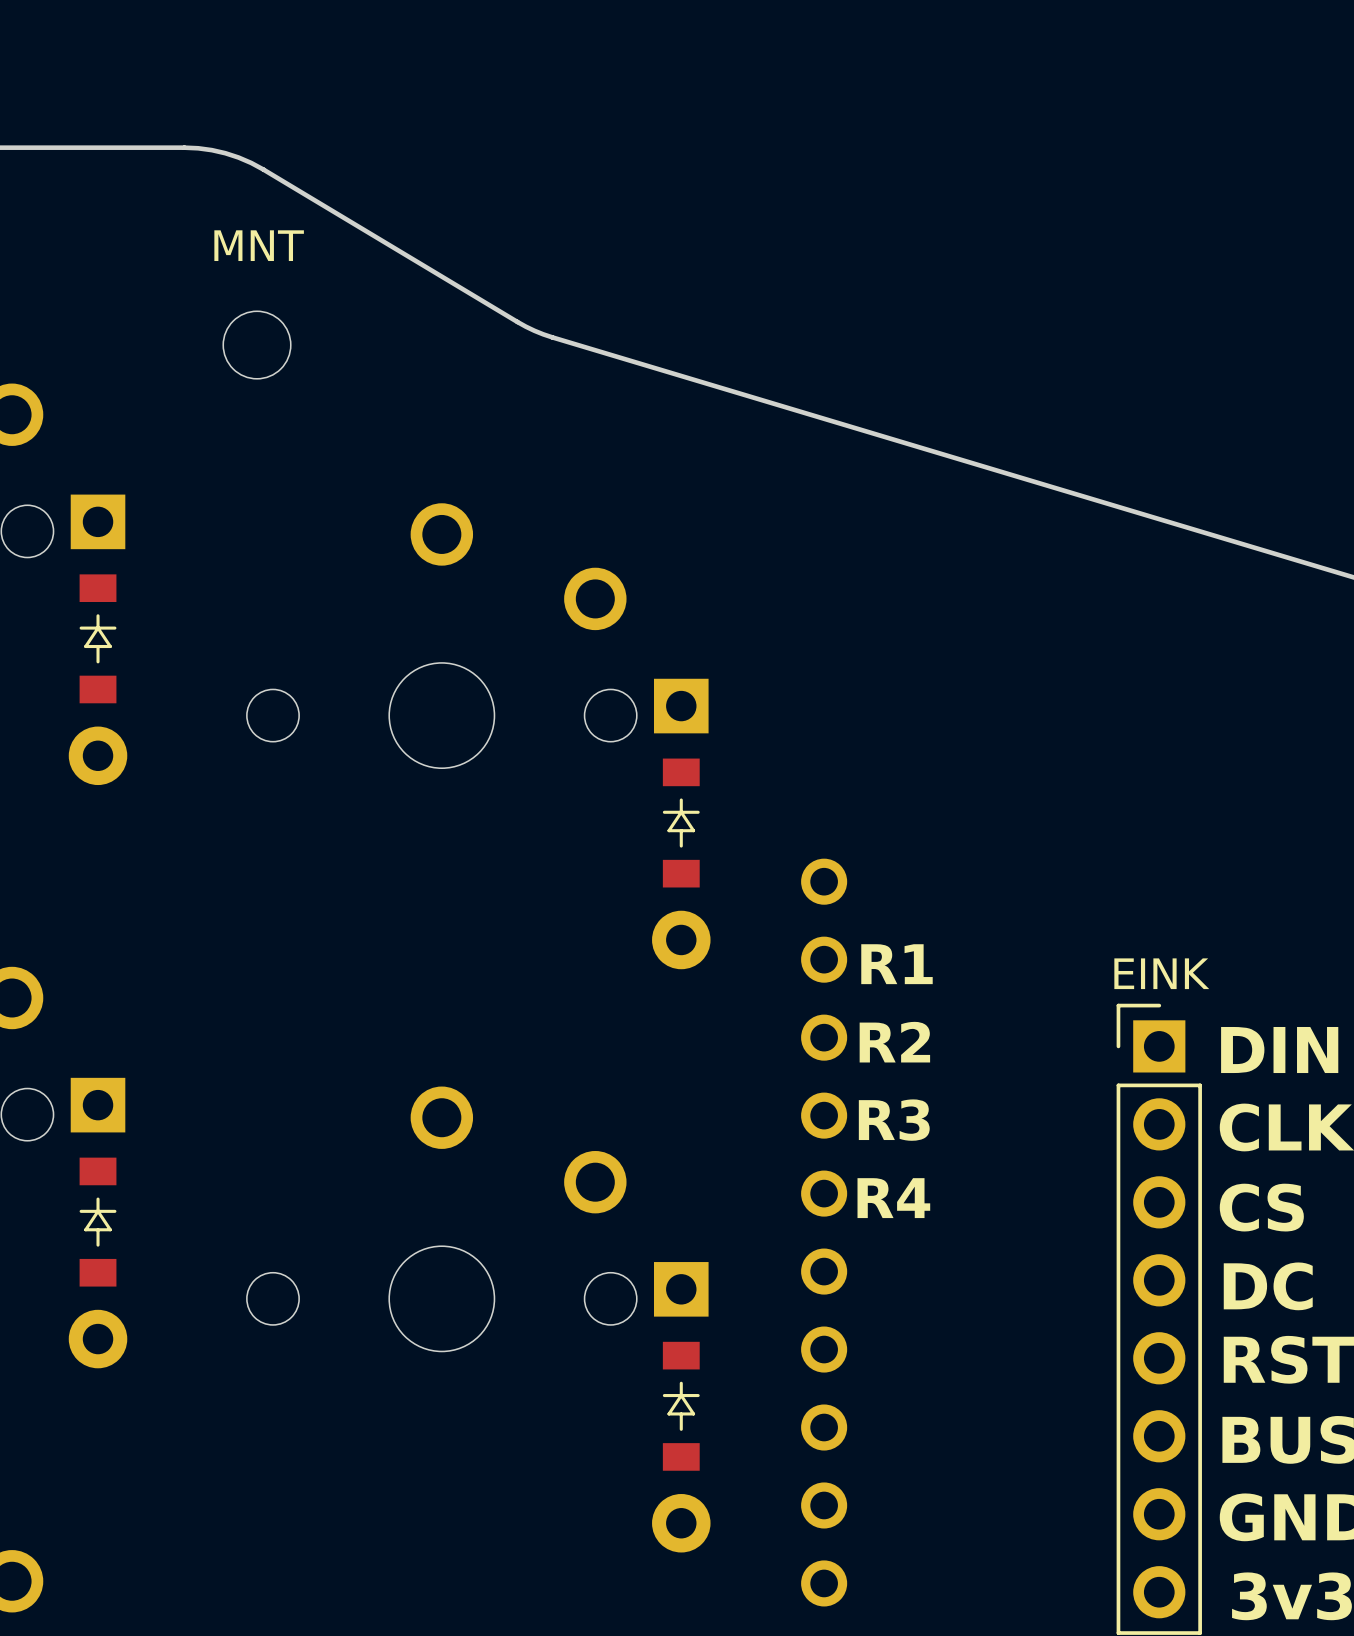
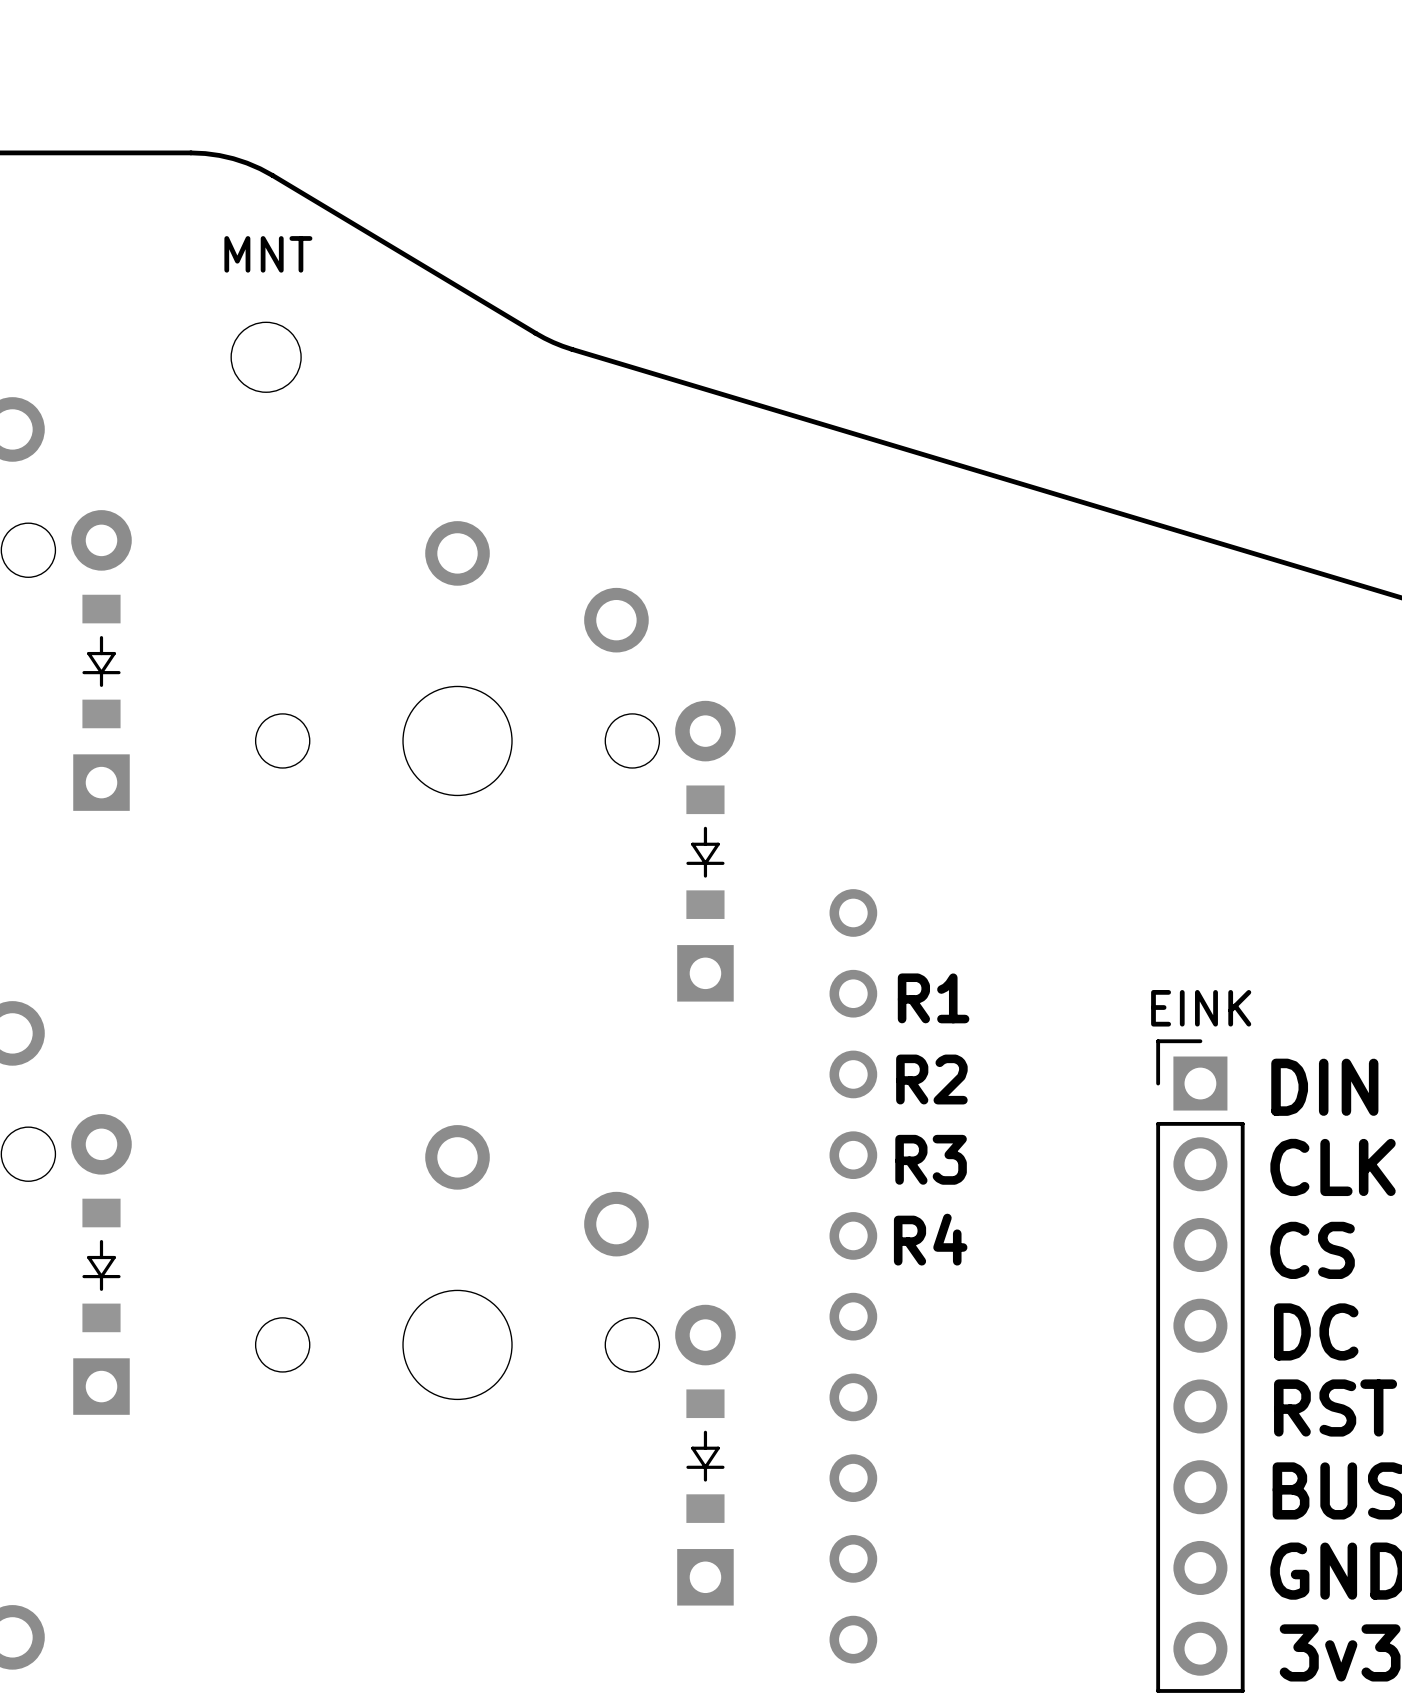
part rotation: 0° (98, 639) -> 180° (101, 660)
part rotation: 0° (681, 823) -> 180° (705, 851)
part rotation: 0° (98, 1223) -> 180° (101, 1264)
part rotation: 0° (681, 1407) -> 180° (705, 1455)

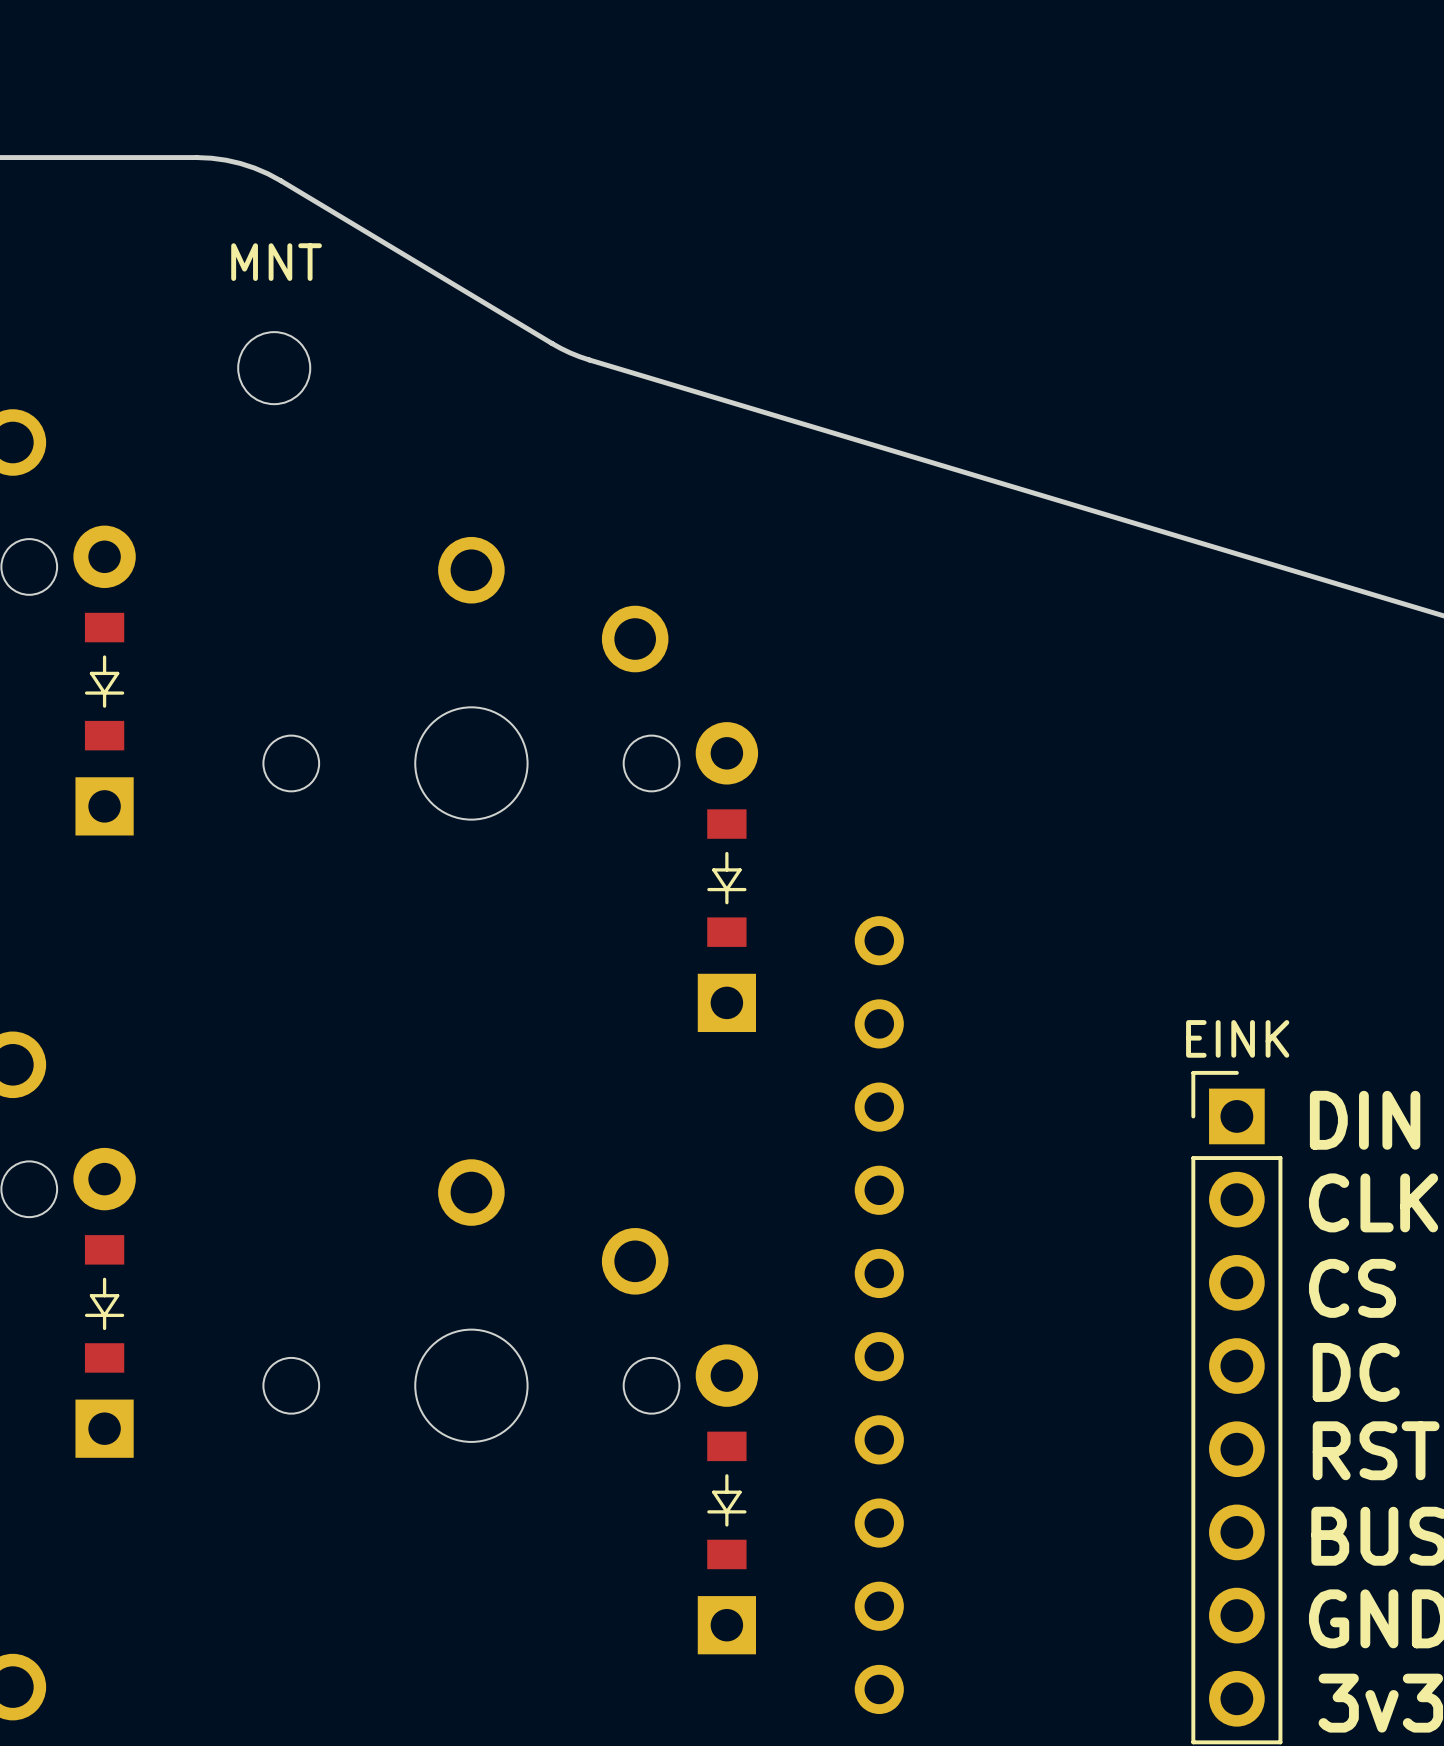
text: R1 (933, 998) -> none
text: R2 (931, 1079) -> none
text: R3 (931, 1159) -> none
text: R4 (930, 1239) -> none

